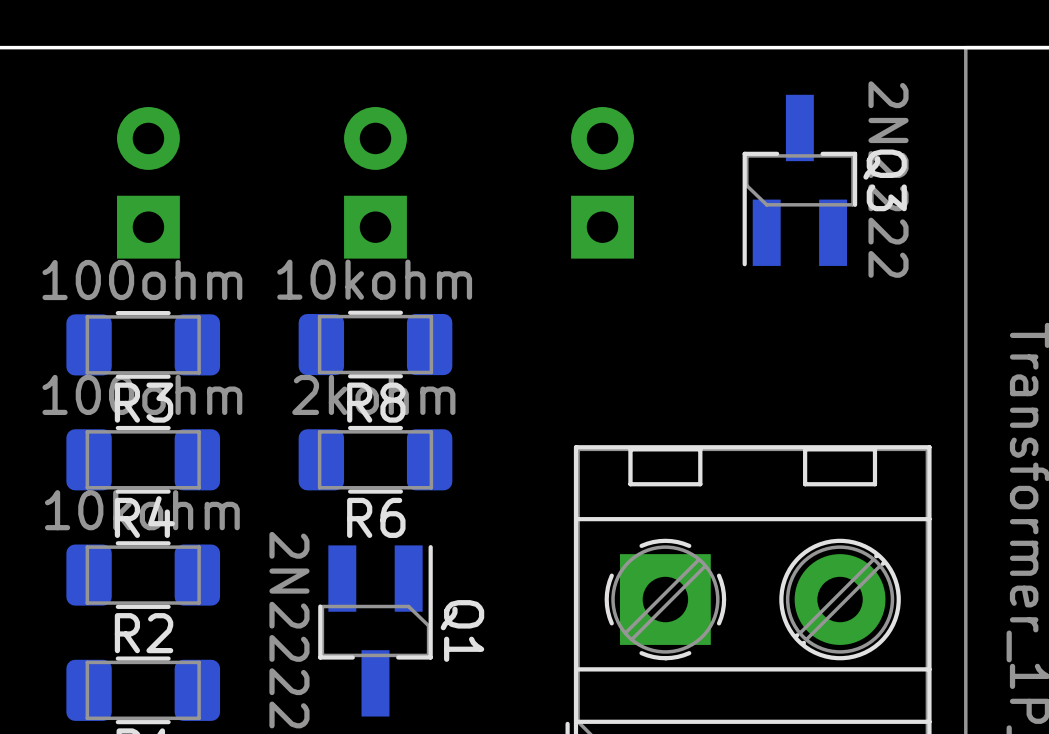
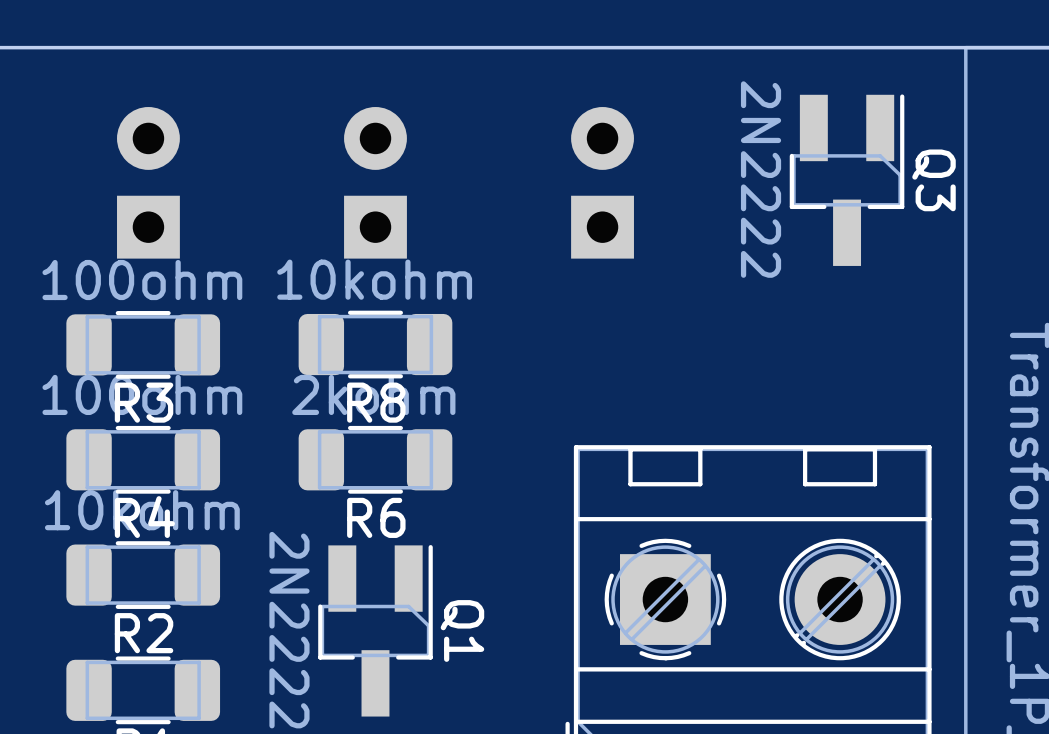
Q3 rotation: 0° (799, 180) -> 180° (847, 180)

